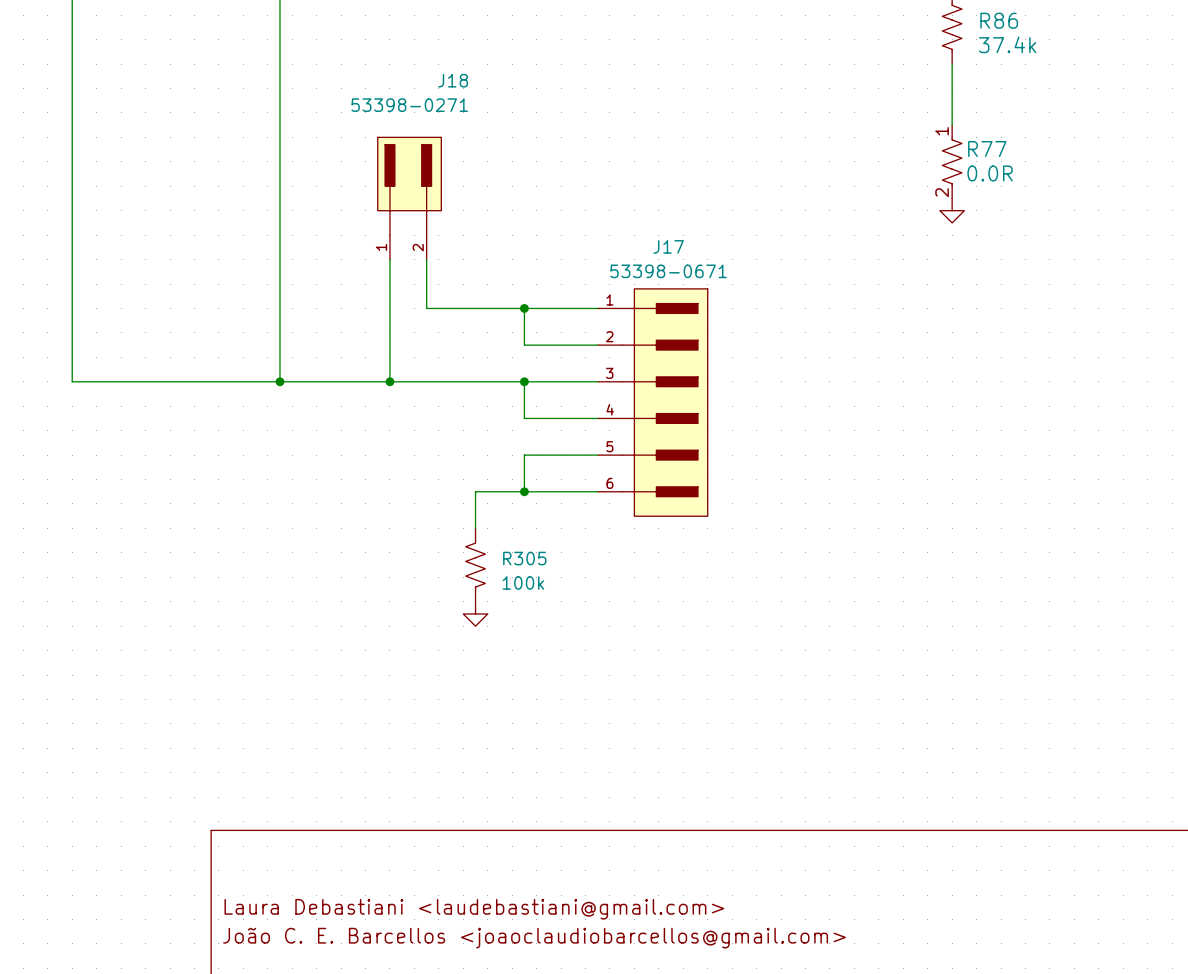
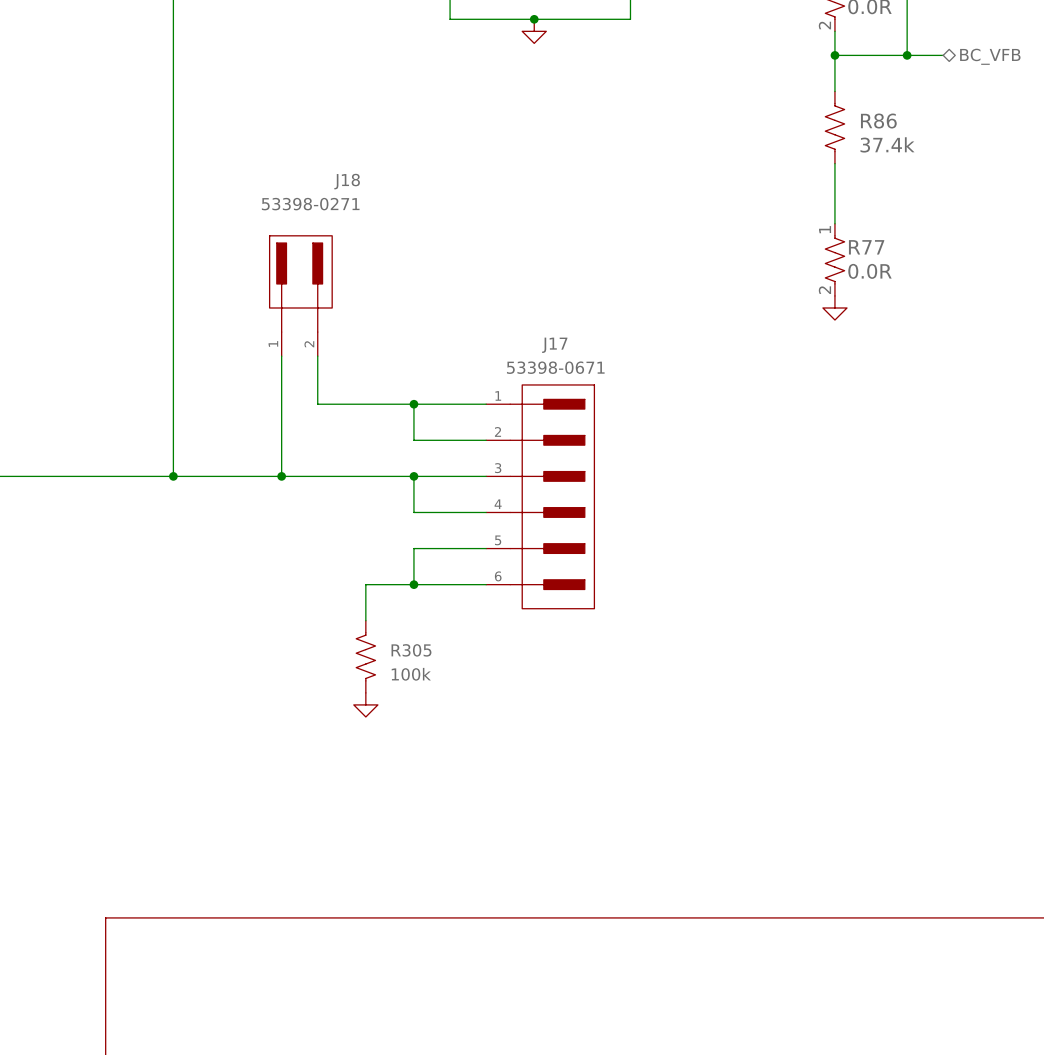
title block: Laura Debastiani <laudebastiani@gmail.com> (474, 909) -> none
title block: João C. E. Barcellos <joaoclaudiobarcellos@gmail.com> (534, 938) -> none

